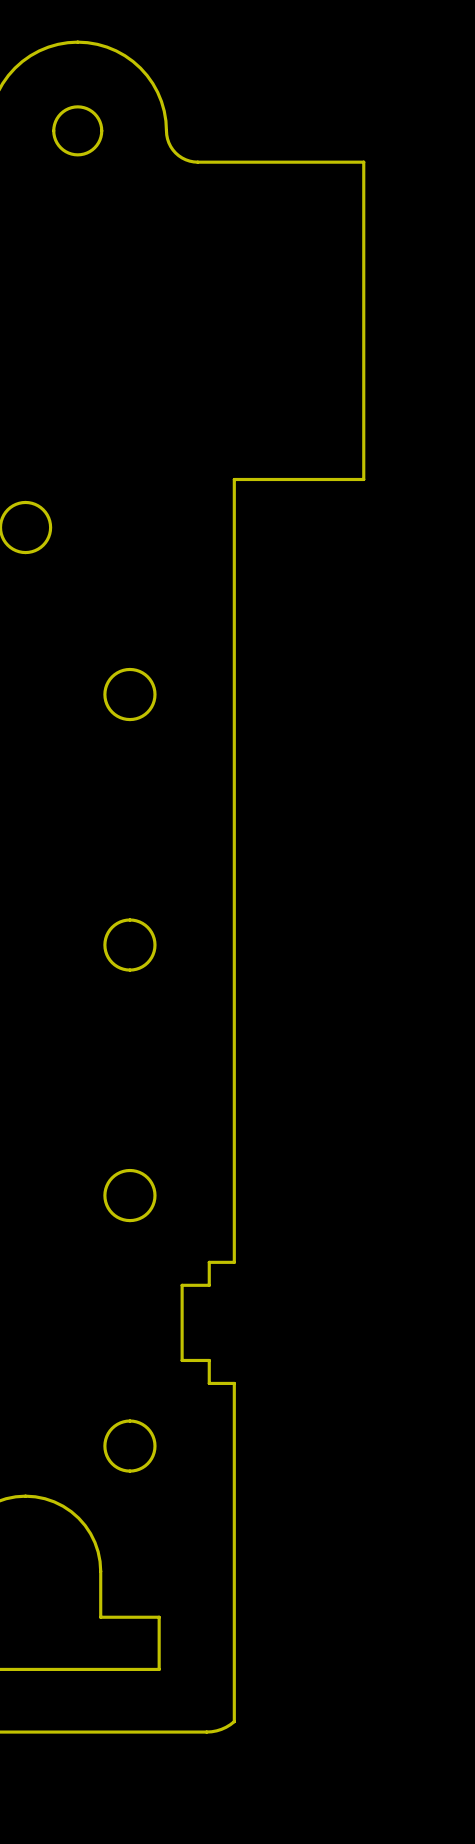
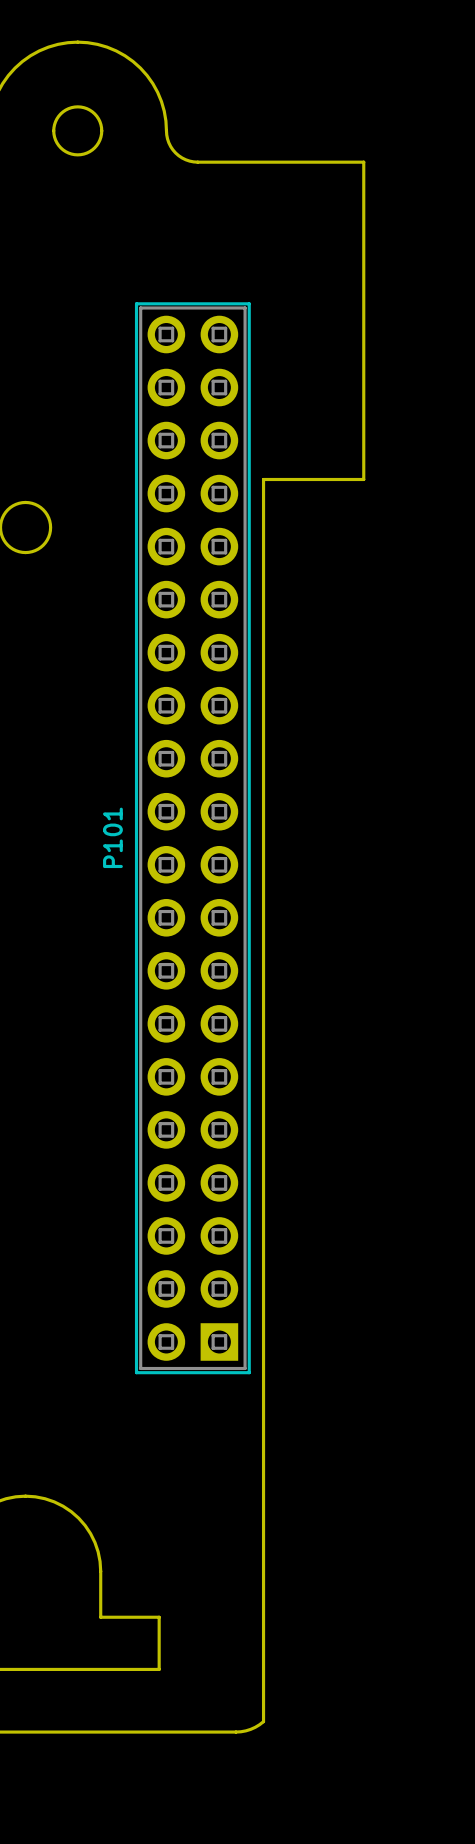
board edge: (263, 479) (234, 479) (234, 1262) (209, 1262) (209, 1285) (182, 1285) (182, 1360) (209, 1360) (209, 1383) (234, 1383) (234, 1721) (221, 1729) (206, 1732) -> (263, 479) (263, 1721) (245, 1730) (206, 1732)
board edge: (129, 669) (120, 671) (112, 676) (106, 684) (104, 694) (106, 704) (112, 712) (120, 717) (129, 719) (139, 717) (147, 712) (153, 704) (154, 694) (153, 684) (147, 676) (139, 671) (129, 669) -> none
P101: none -> (192, 838)
board edge: (129, 919) (120, 921) (112, 927) (106, 935) (104, 945) (106, 954) (112, 962) (120, 968) (129, 970) (139, 968) (147, 962) (153, 954) (154, 945) (153, 935) (147, 927) (139, 921) (129, 919) -> none
board edge: (129, 1170) (139, 1172) (147, 1177) (153, 1185) (154, 1195) (153, 1205) (147, 1213) (139, 1218) (129, 1220) (120, 1218) (112, 1213) (106, 1205) (104, 1195) (106, 1185) (112, 1177) (120, 1172) (129, 1170) -> none
board edge: (129, 1421) (120, 1422) (112, 1428) (106, 1436) (104, 1446) (106, 1455) (112, 1463) (120, 1469) (129, 1471) (139, 1469) (147, 1463) (153, 1455) (154, 1446) (153, 1436) (147, 1428) (139, 1422) (129, 1421) -> none

